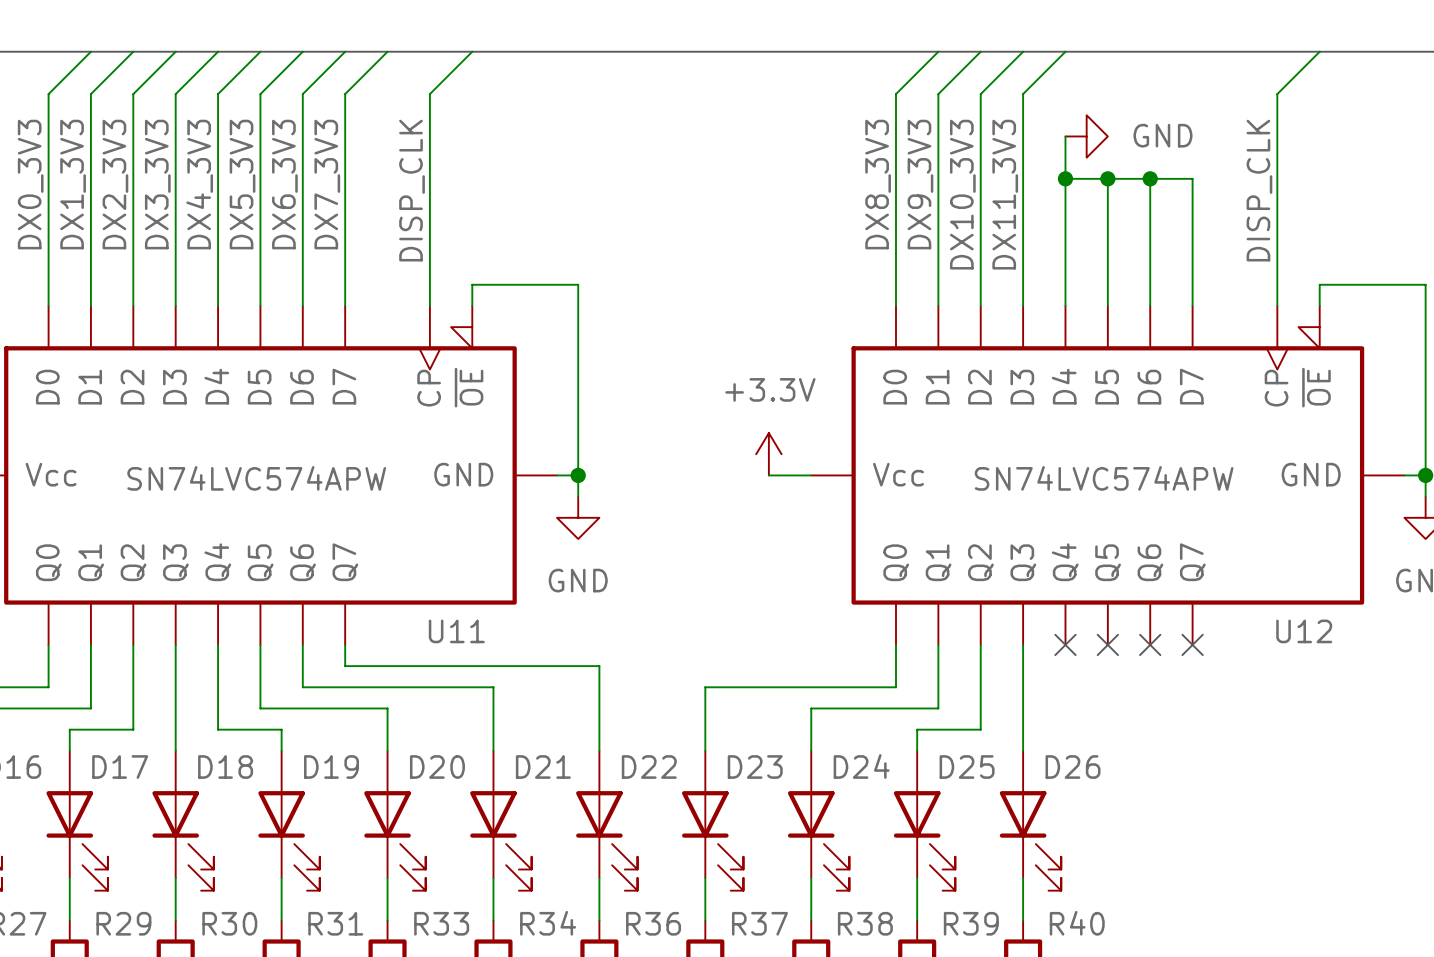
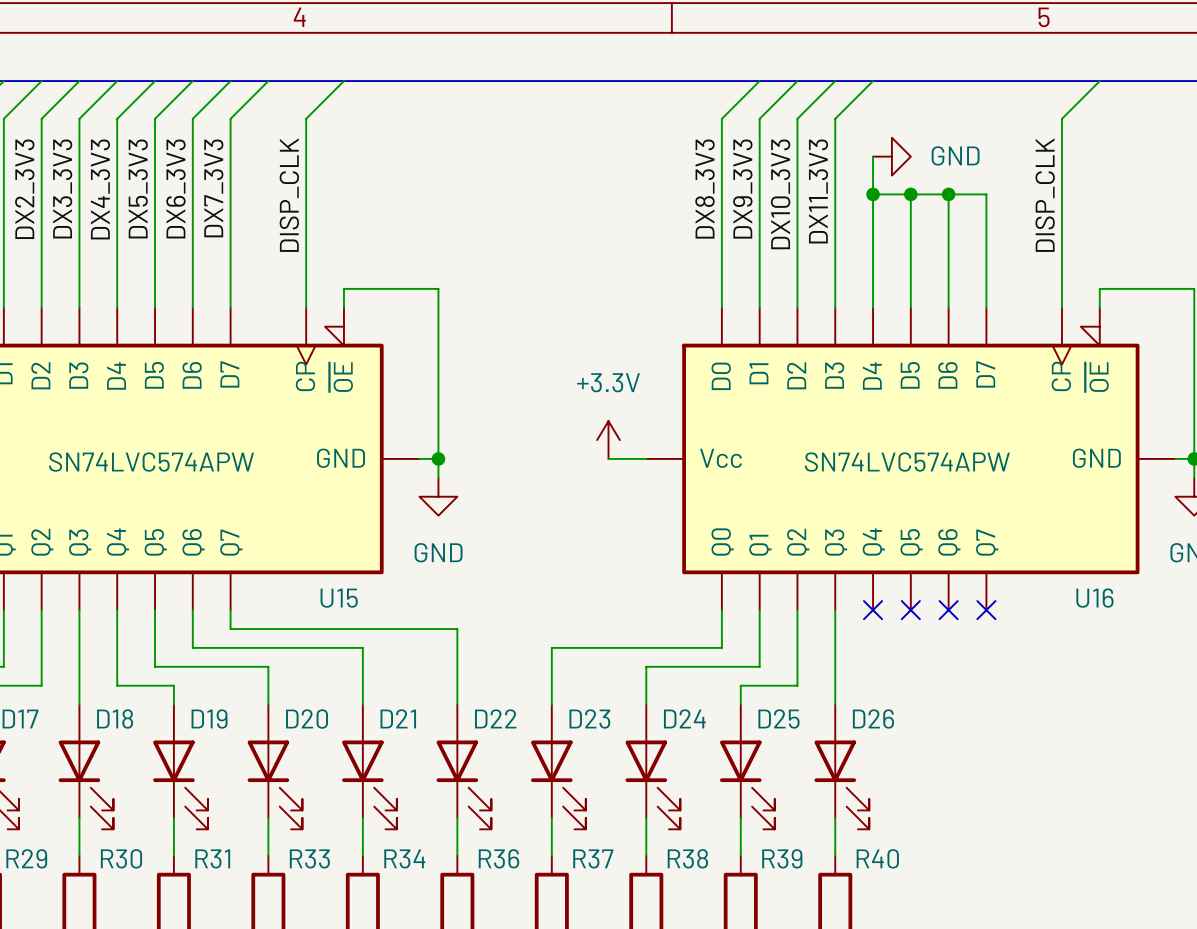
U11 name: U11 (456, 631) -> U15 (339, 598)
U12 name: U12 (1304, 631) -> U16 (1094, 598)

